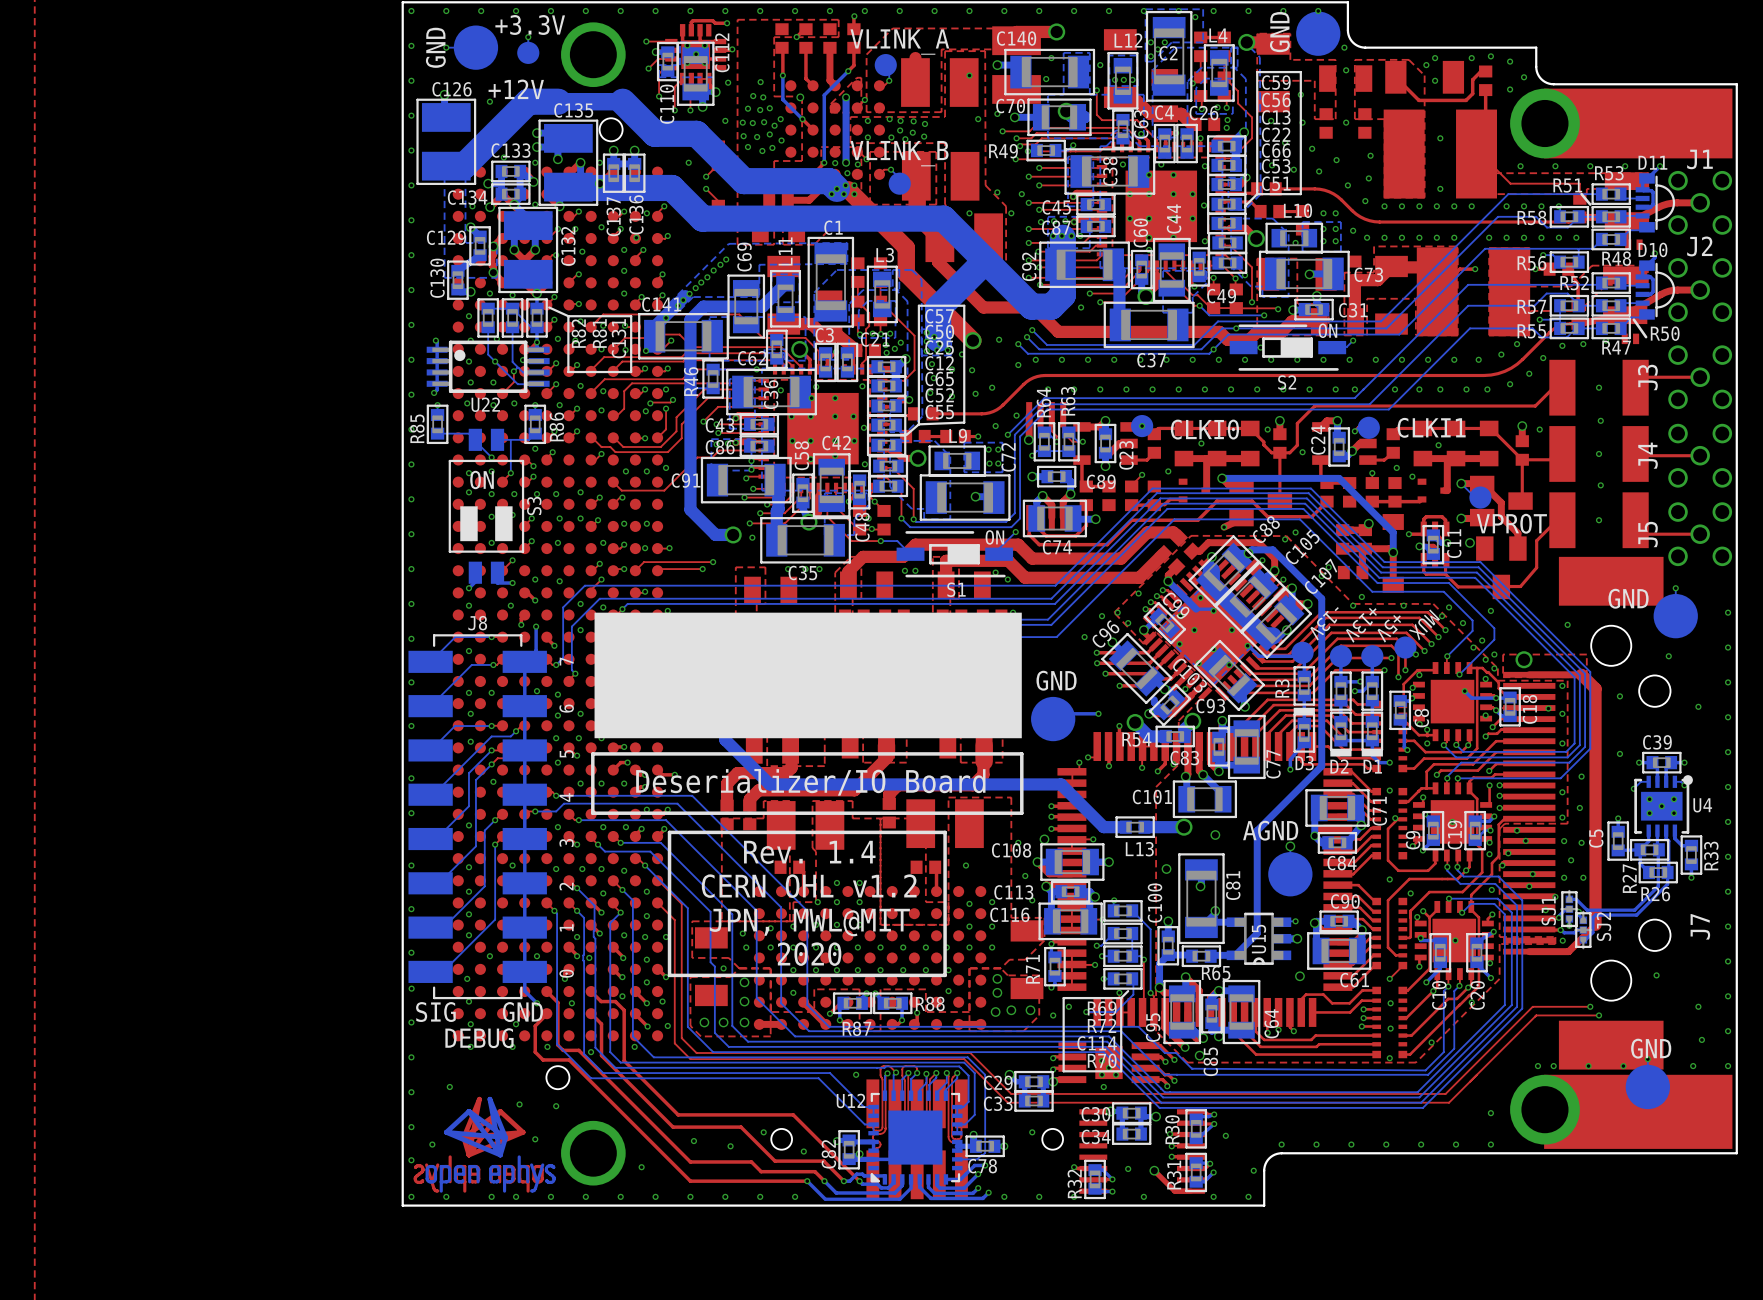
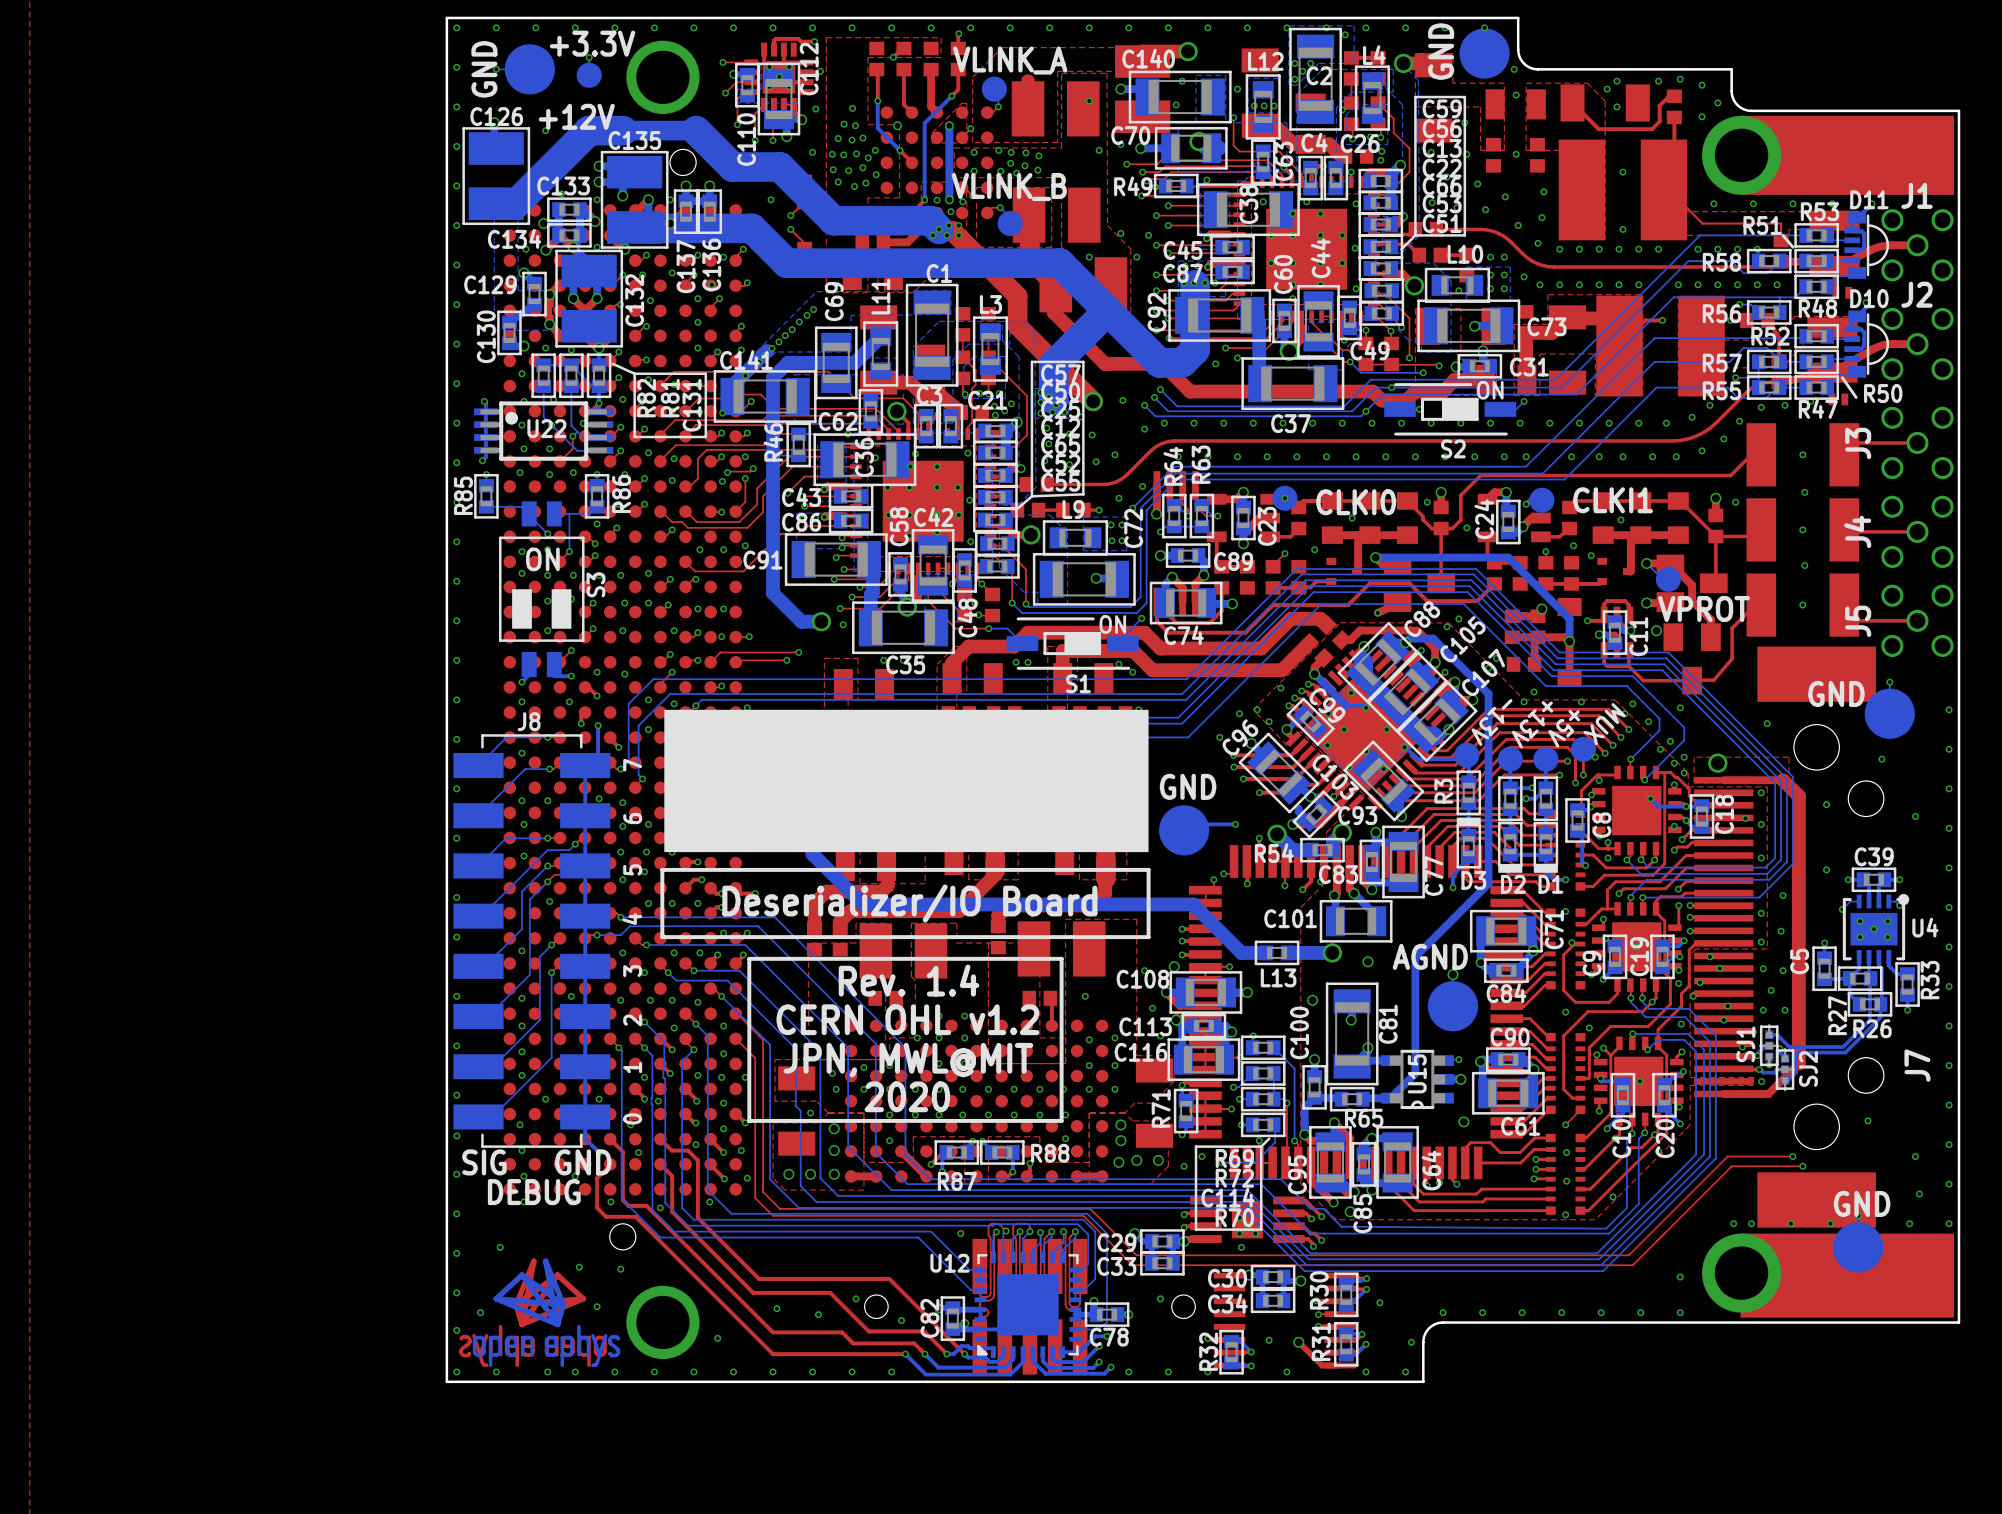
U22 name position: U22 (485, 404) -> U22 (546, 428)

